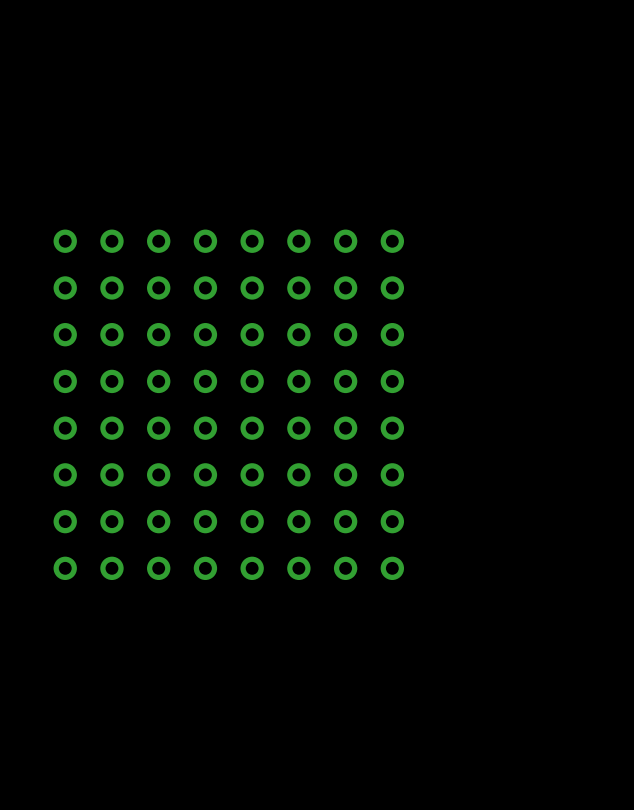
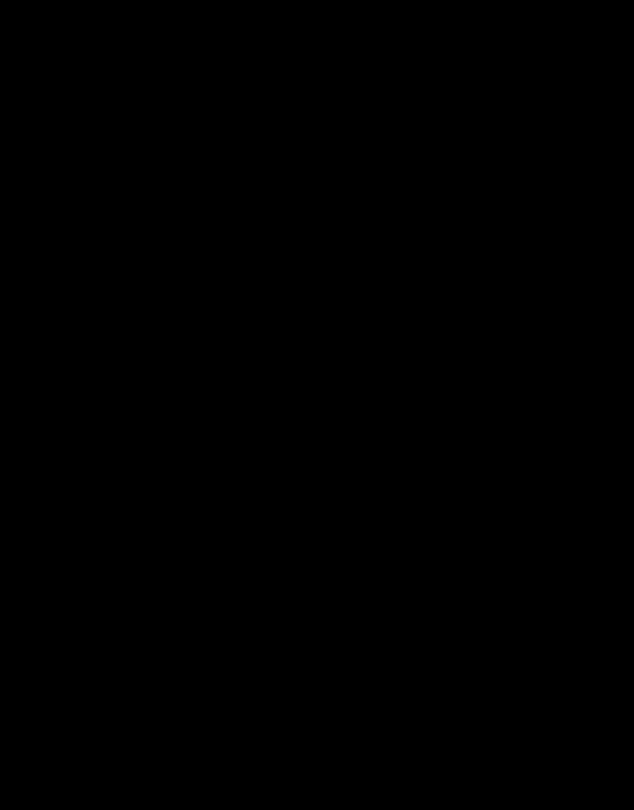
part: (228, 404) -> none

